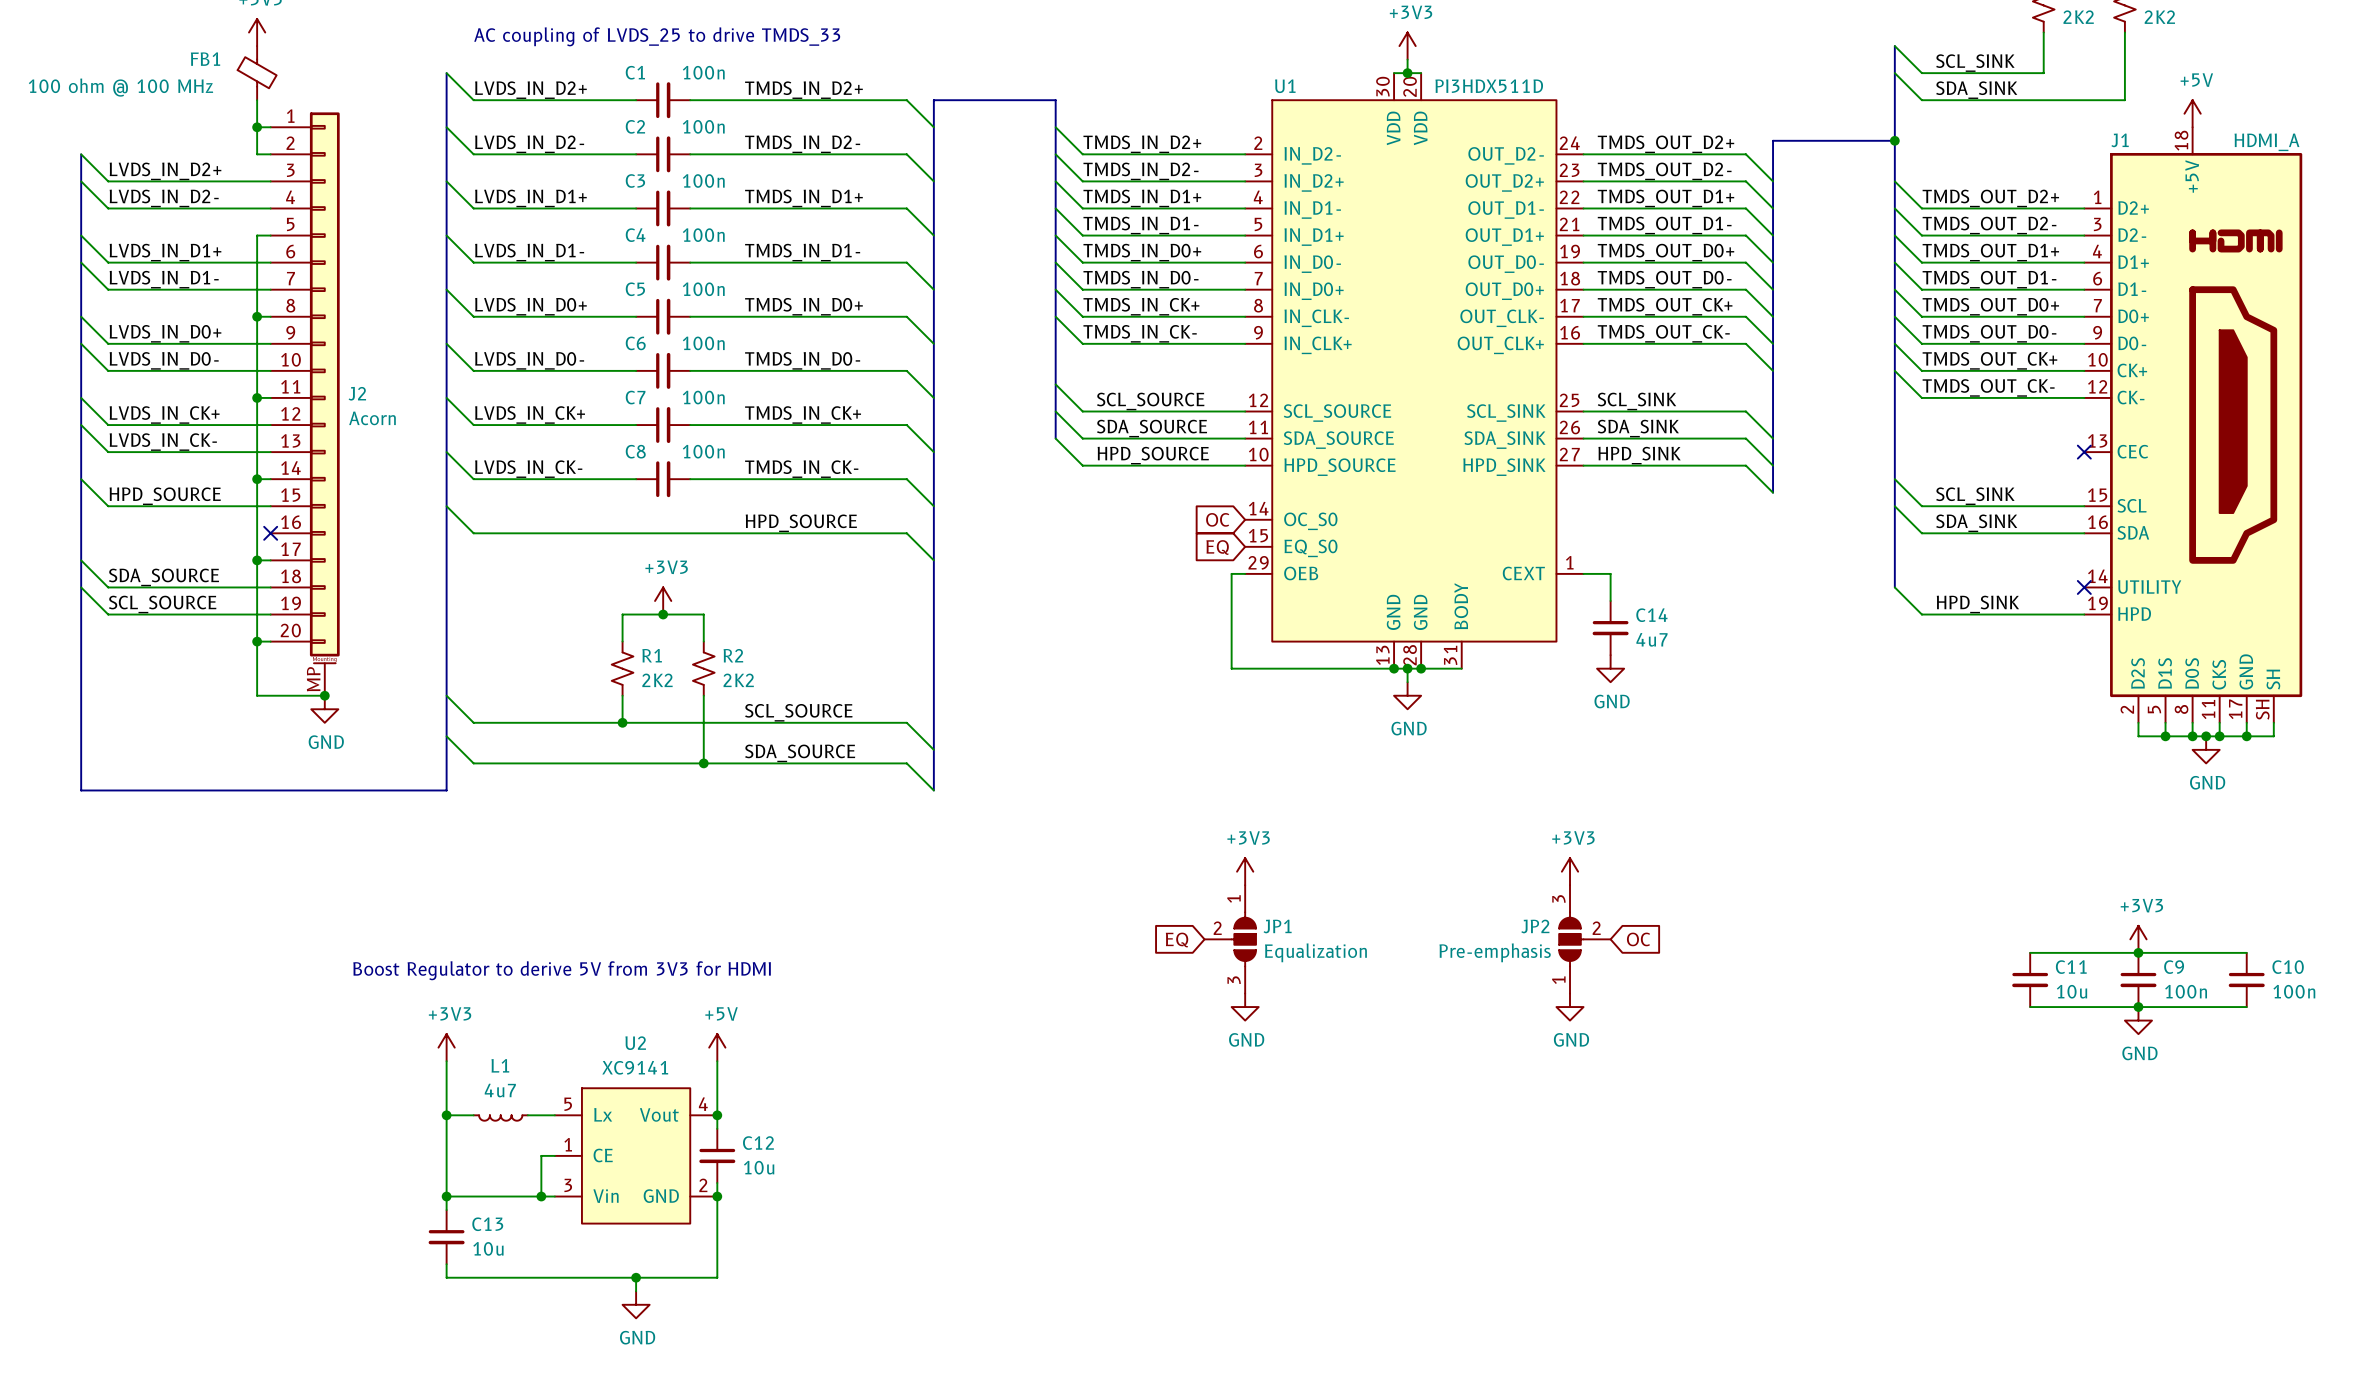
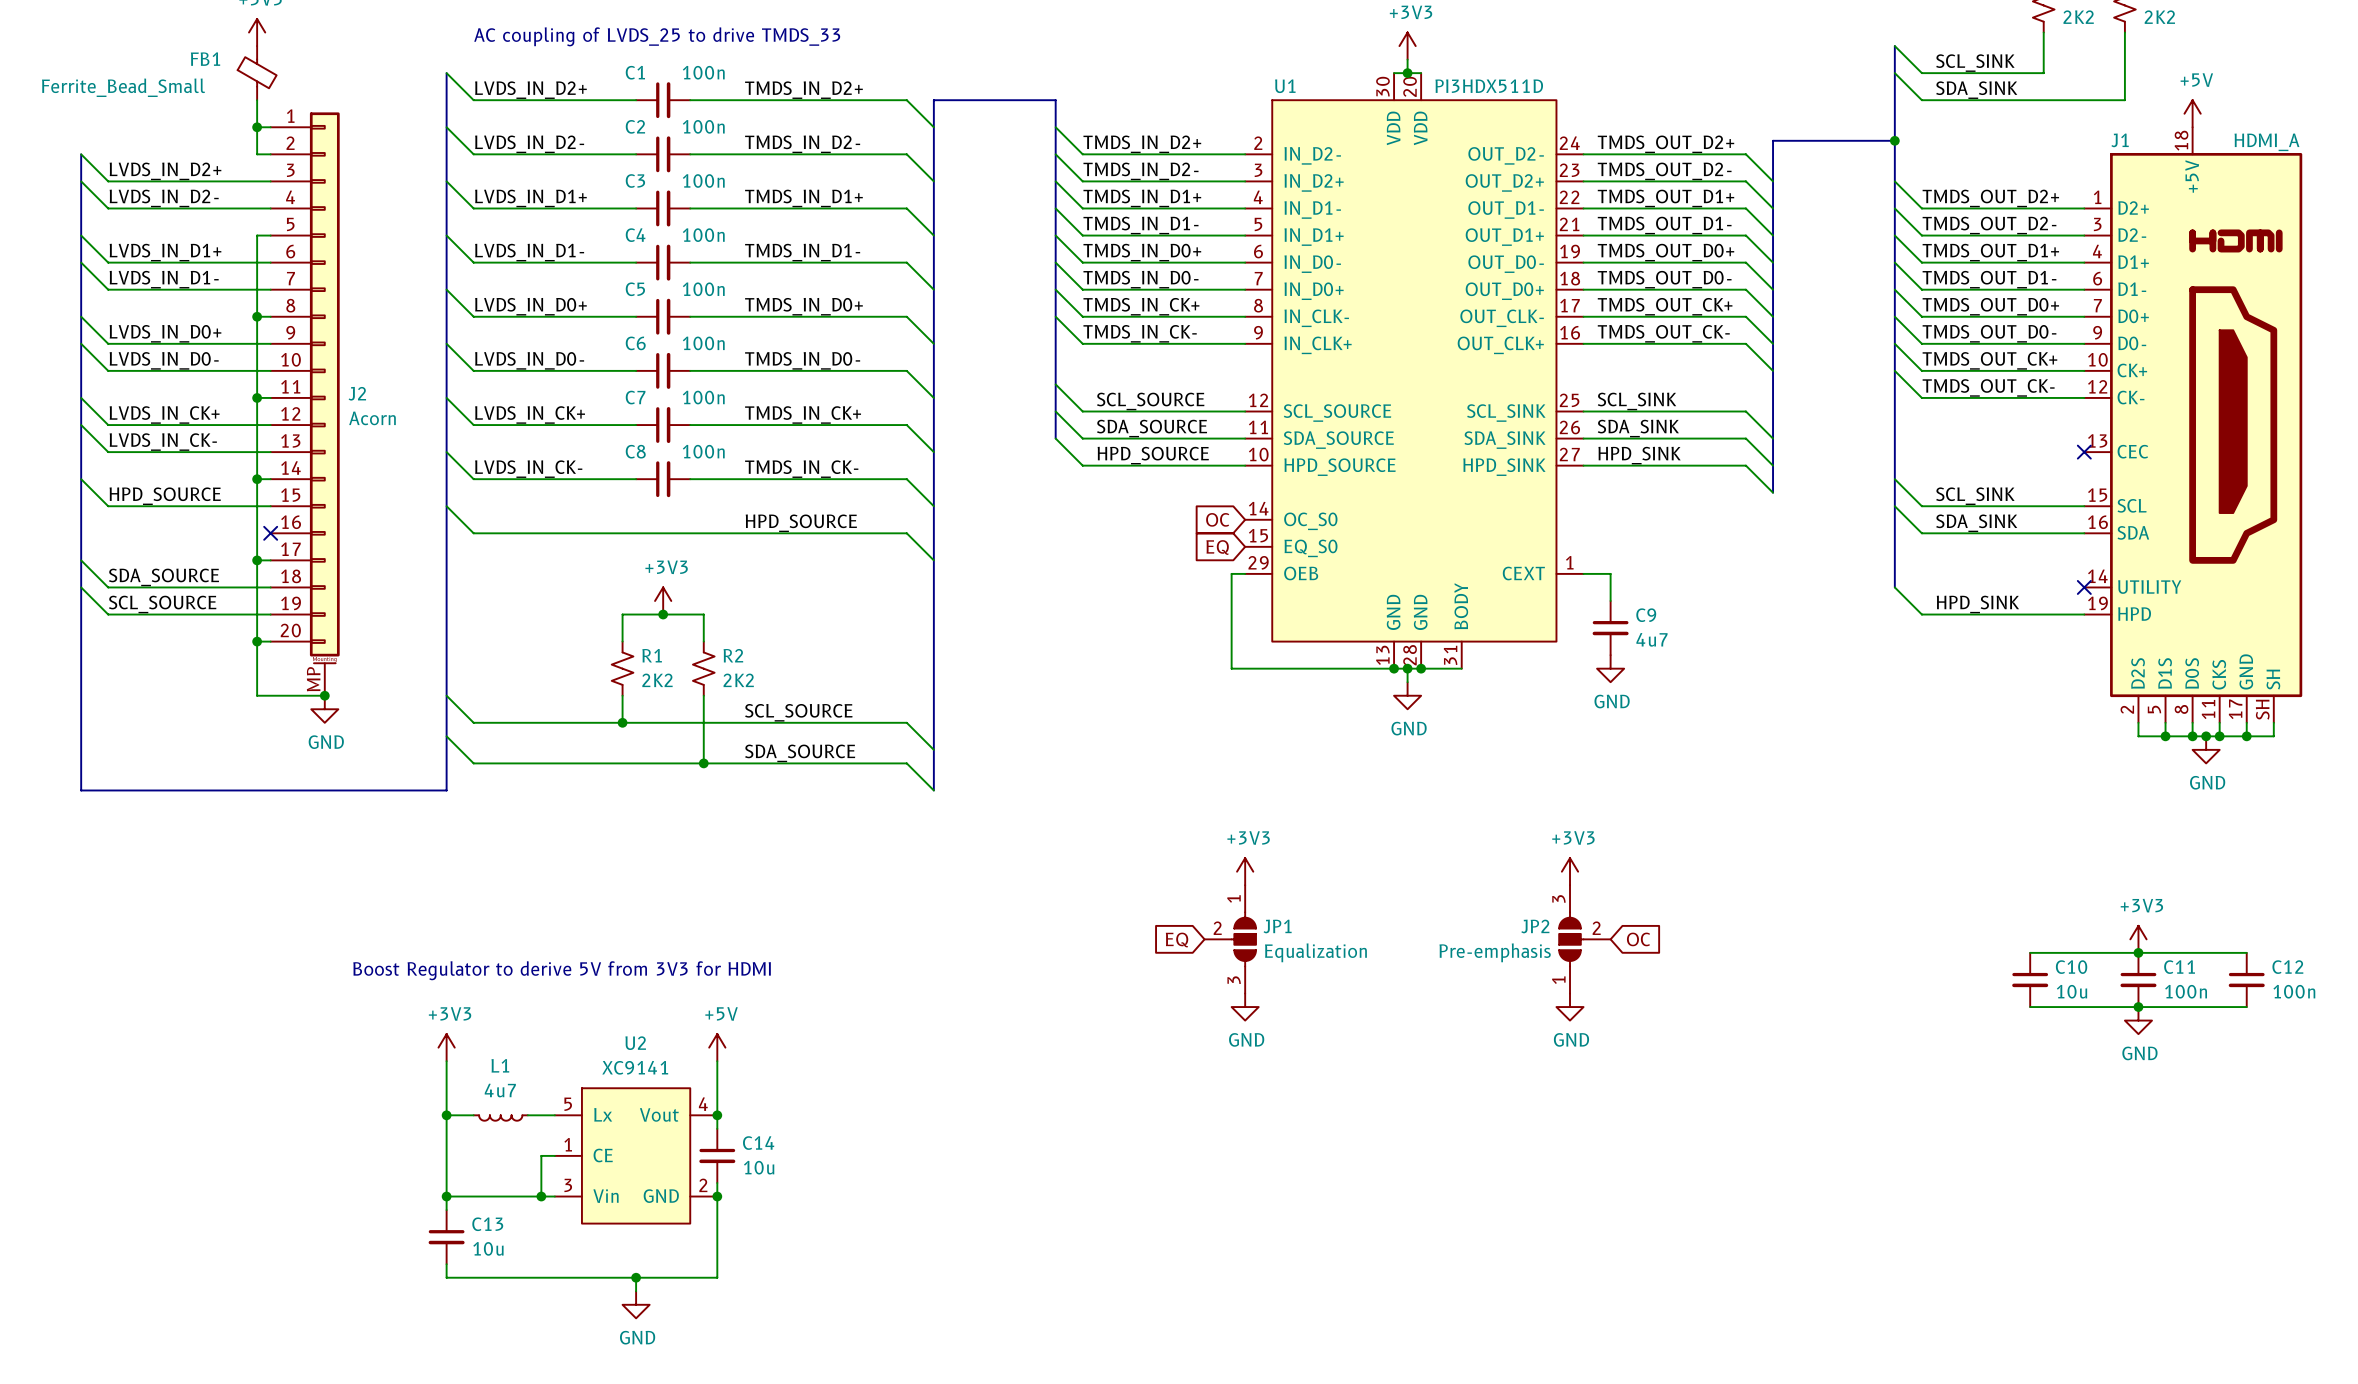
FB1 value: 100 ohm @ 100 MHz (120, 87) -> Ferrite_Bead_Small (123, 87)
C14 name: C14 (1651, 615) -> C9 (1646, 615)
C11 name: C11 (2071, 967) -> C10 (2071, 967)
C9 name: C9 (2174, 967) -> C11 (2179, 967)
C10 name: C10 (2288, 967) -> C12 (2287, 967)
C12 name: C12 (758, 1143) -> C14 (758, 1143)

